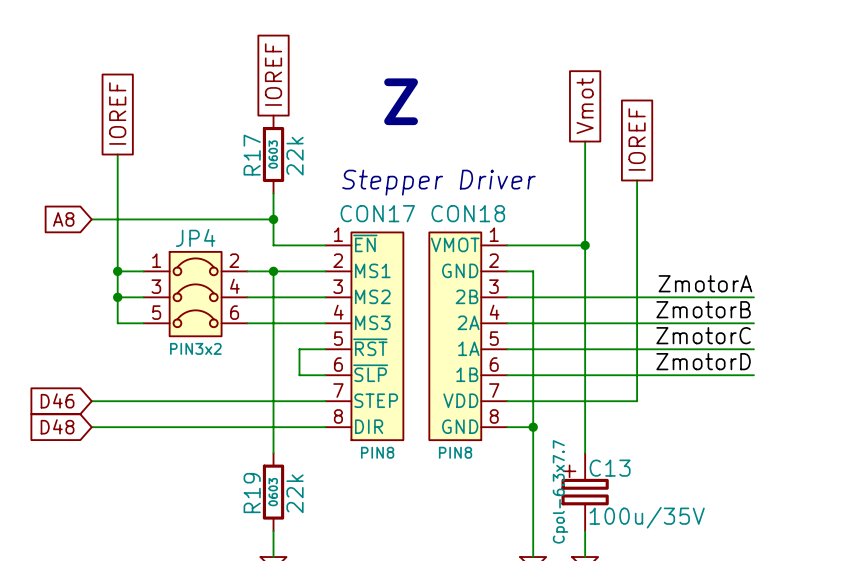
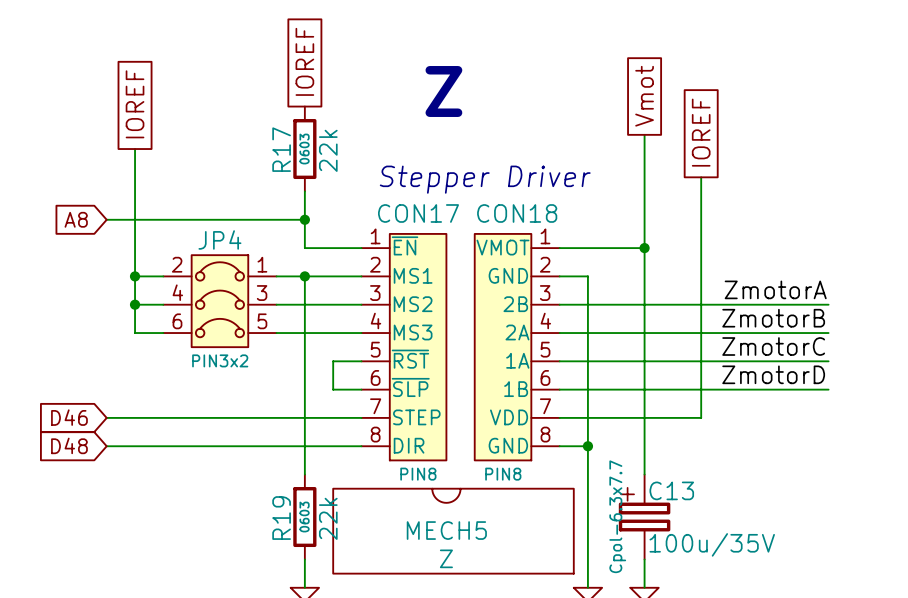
JP4 flip: as is (195, 294) -> left-right (219, 301)
MECH5: none -> Z (453, 531)

